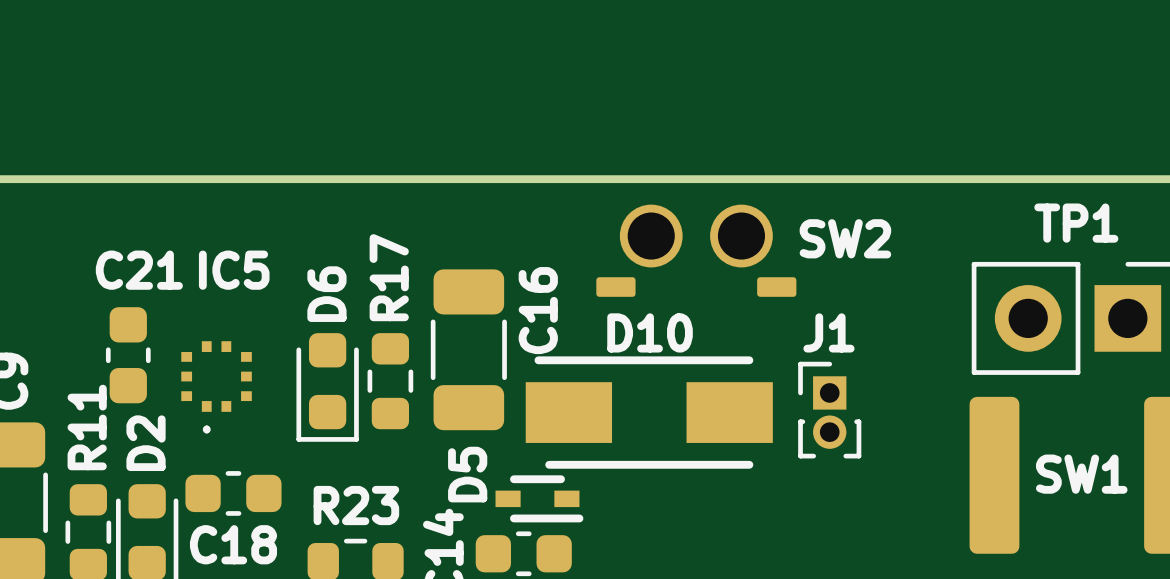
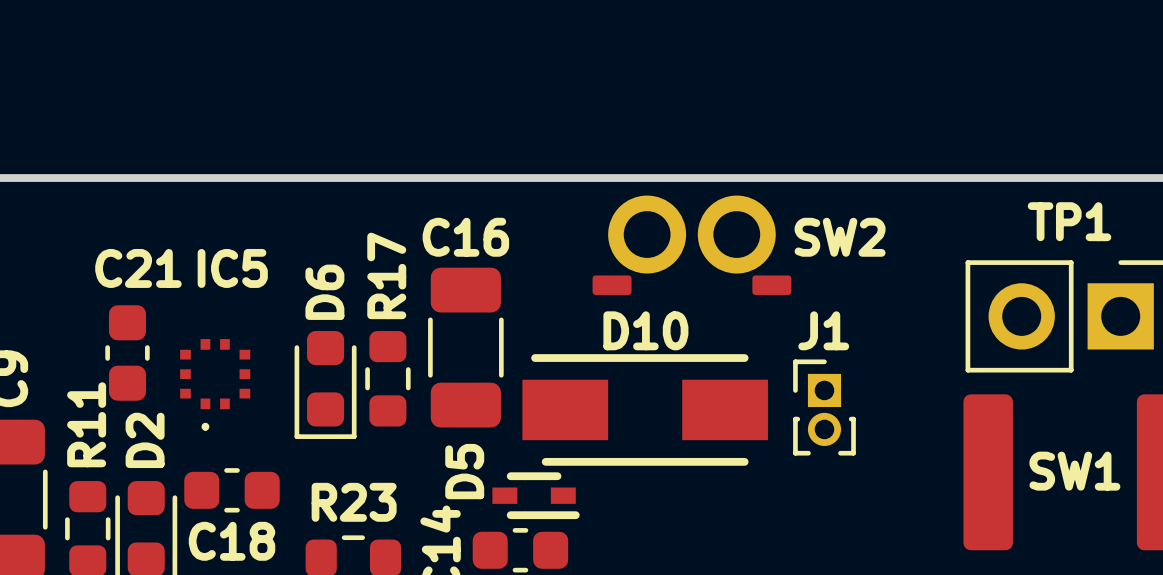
SW2 footprint: [596, 204, 797, 297] -> [592, 195, 792, 295]
C16 name rotation: 0° (538, 310) -> 90° clockwise (465, 237)

